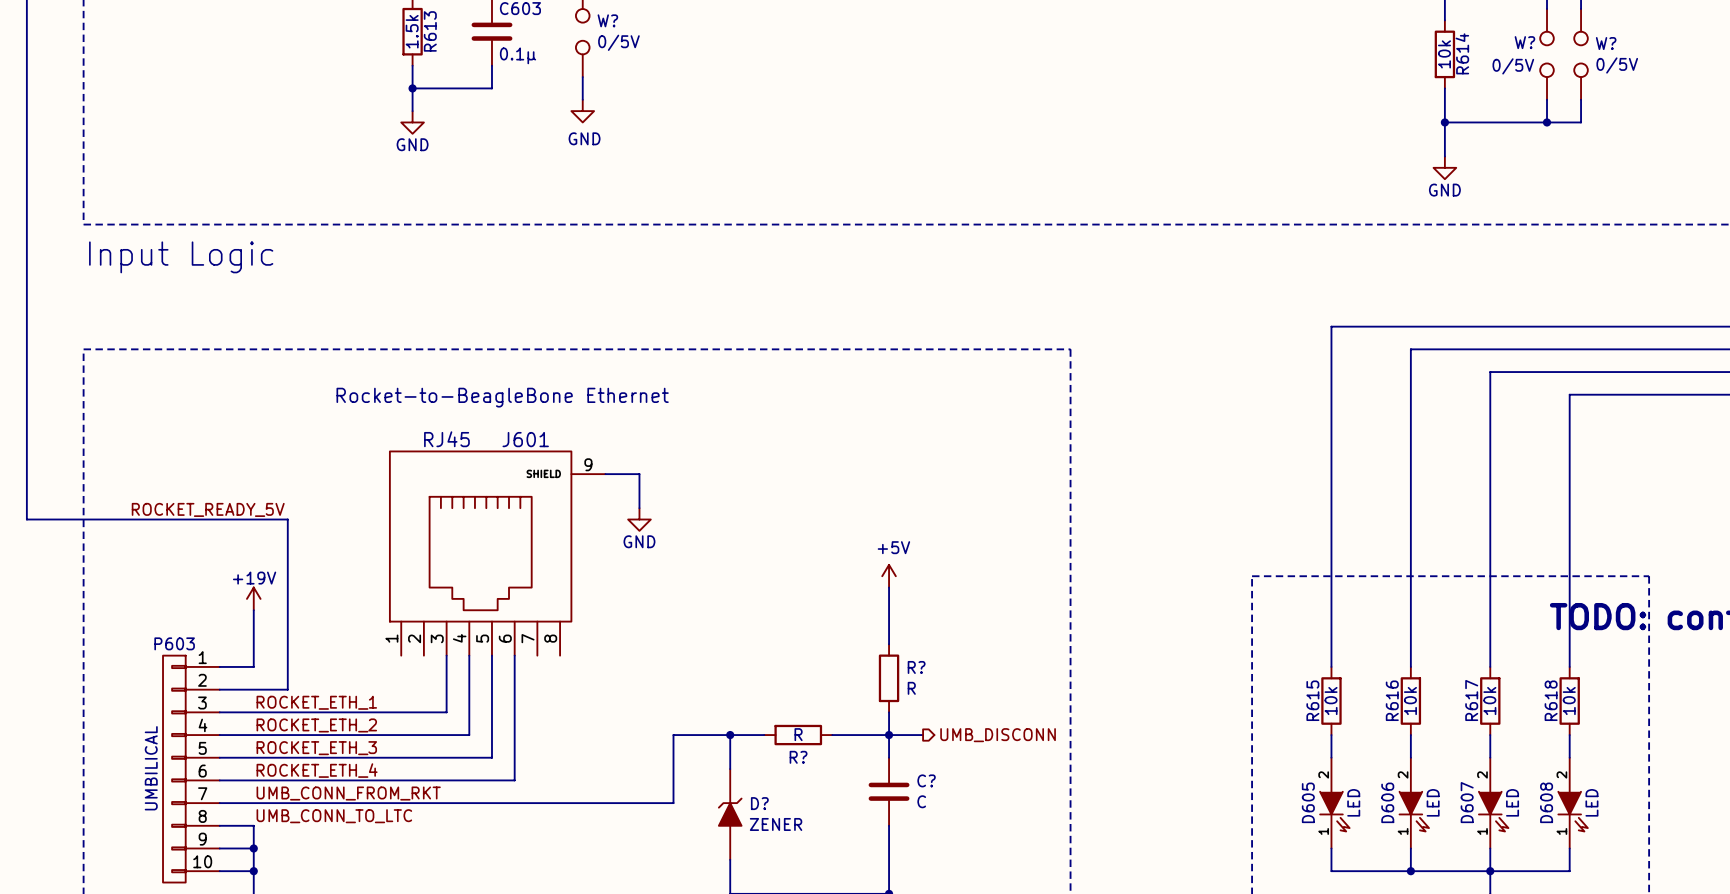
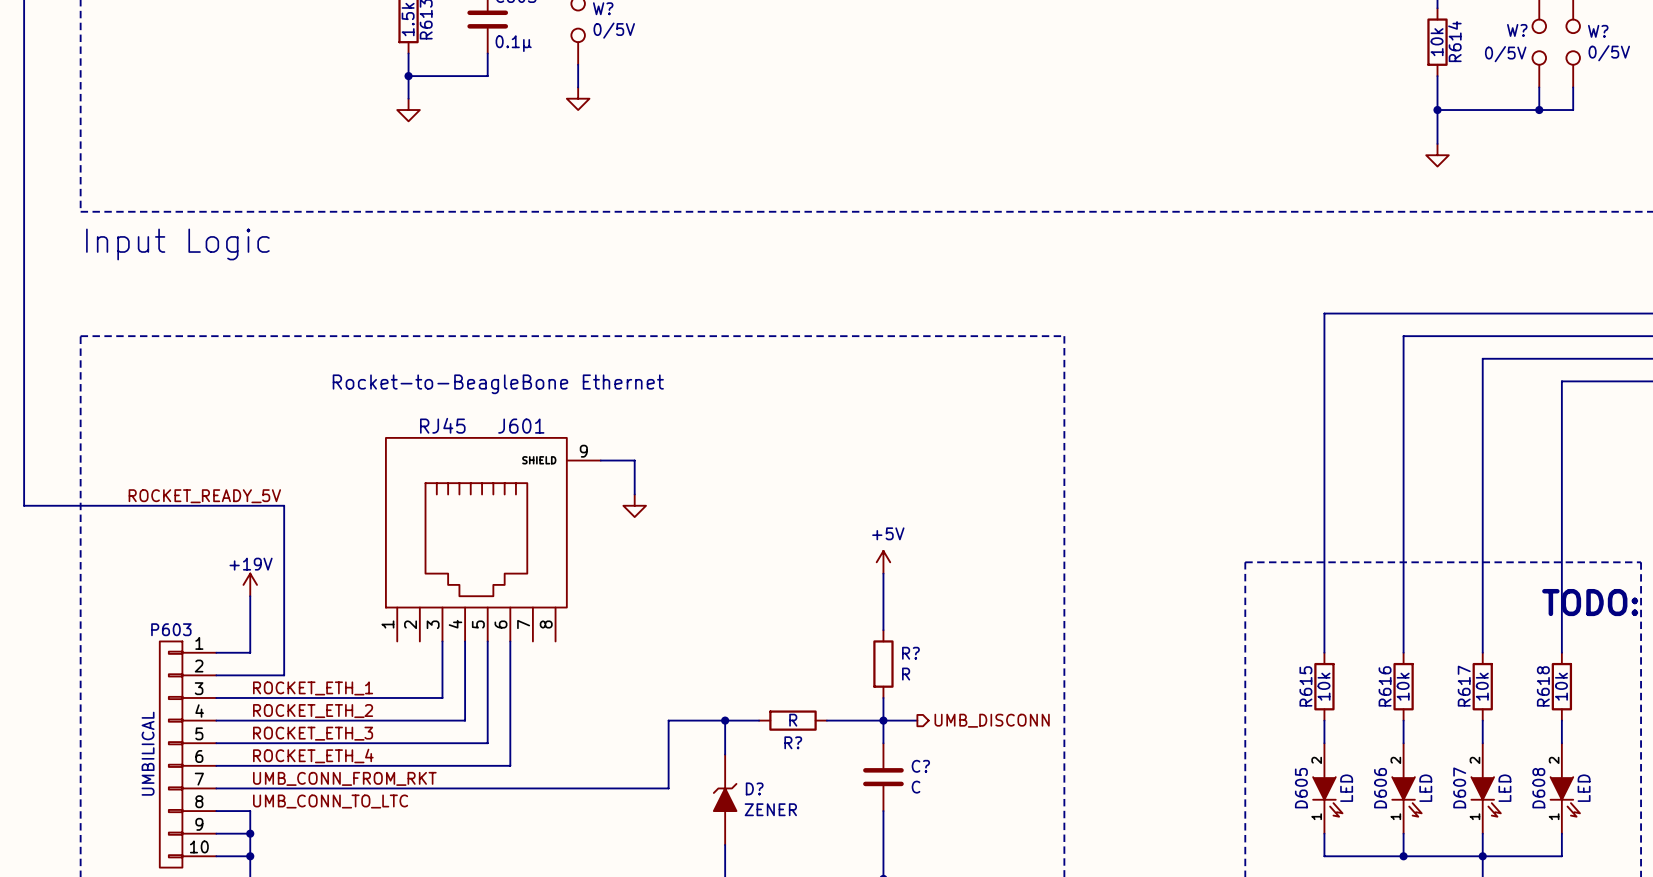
power symbol text: GND (584, 138) -> none
power symbol text: GND (412, 144) -> none
power symbol text: GND (1444, 190) -> none
power symbol text: GND (639, 541) -> none

